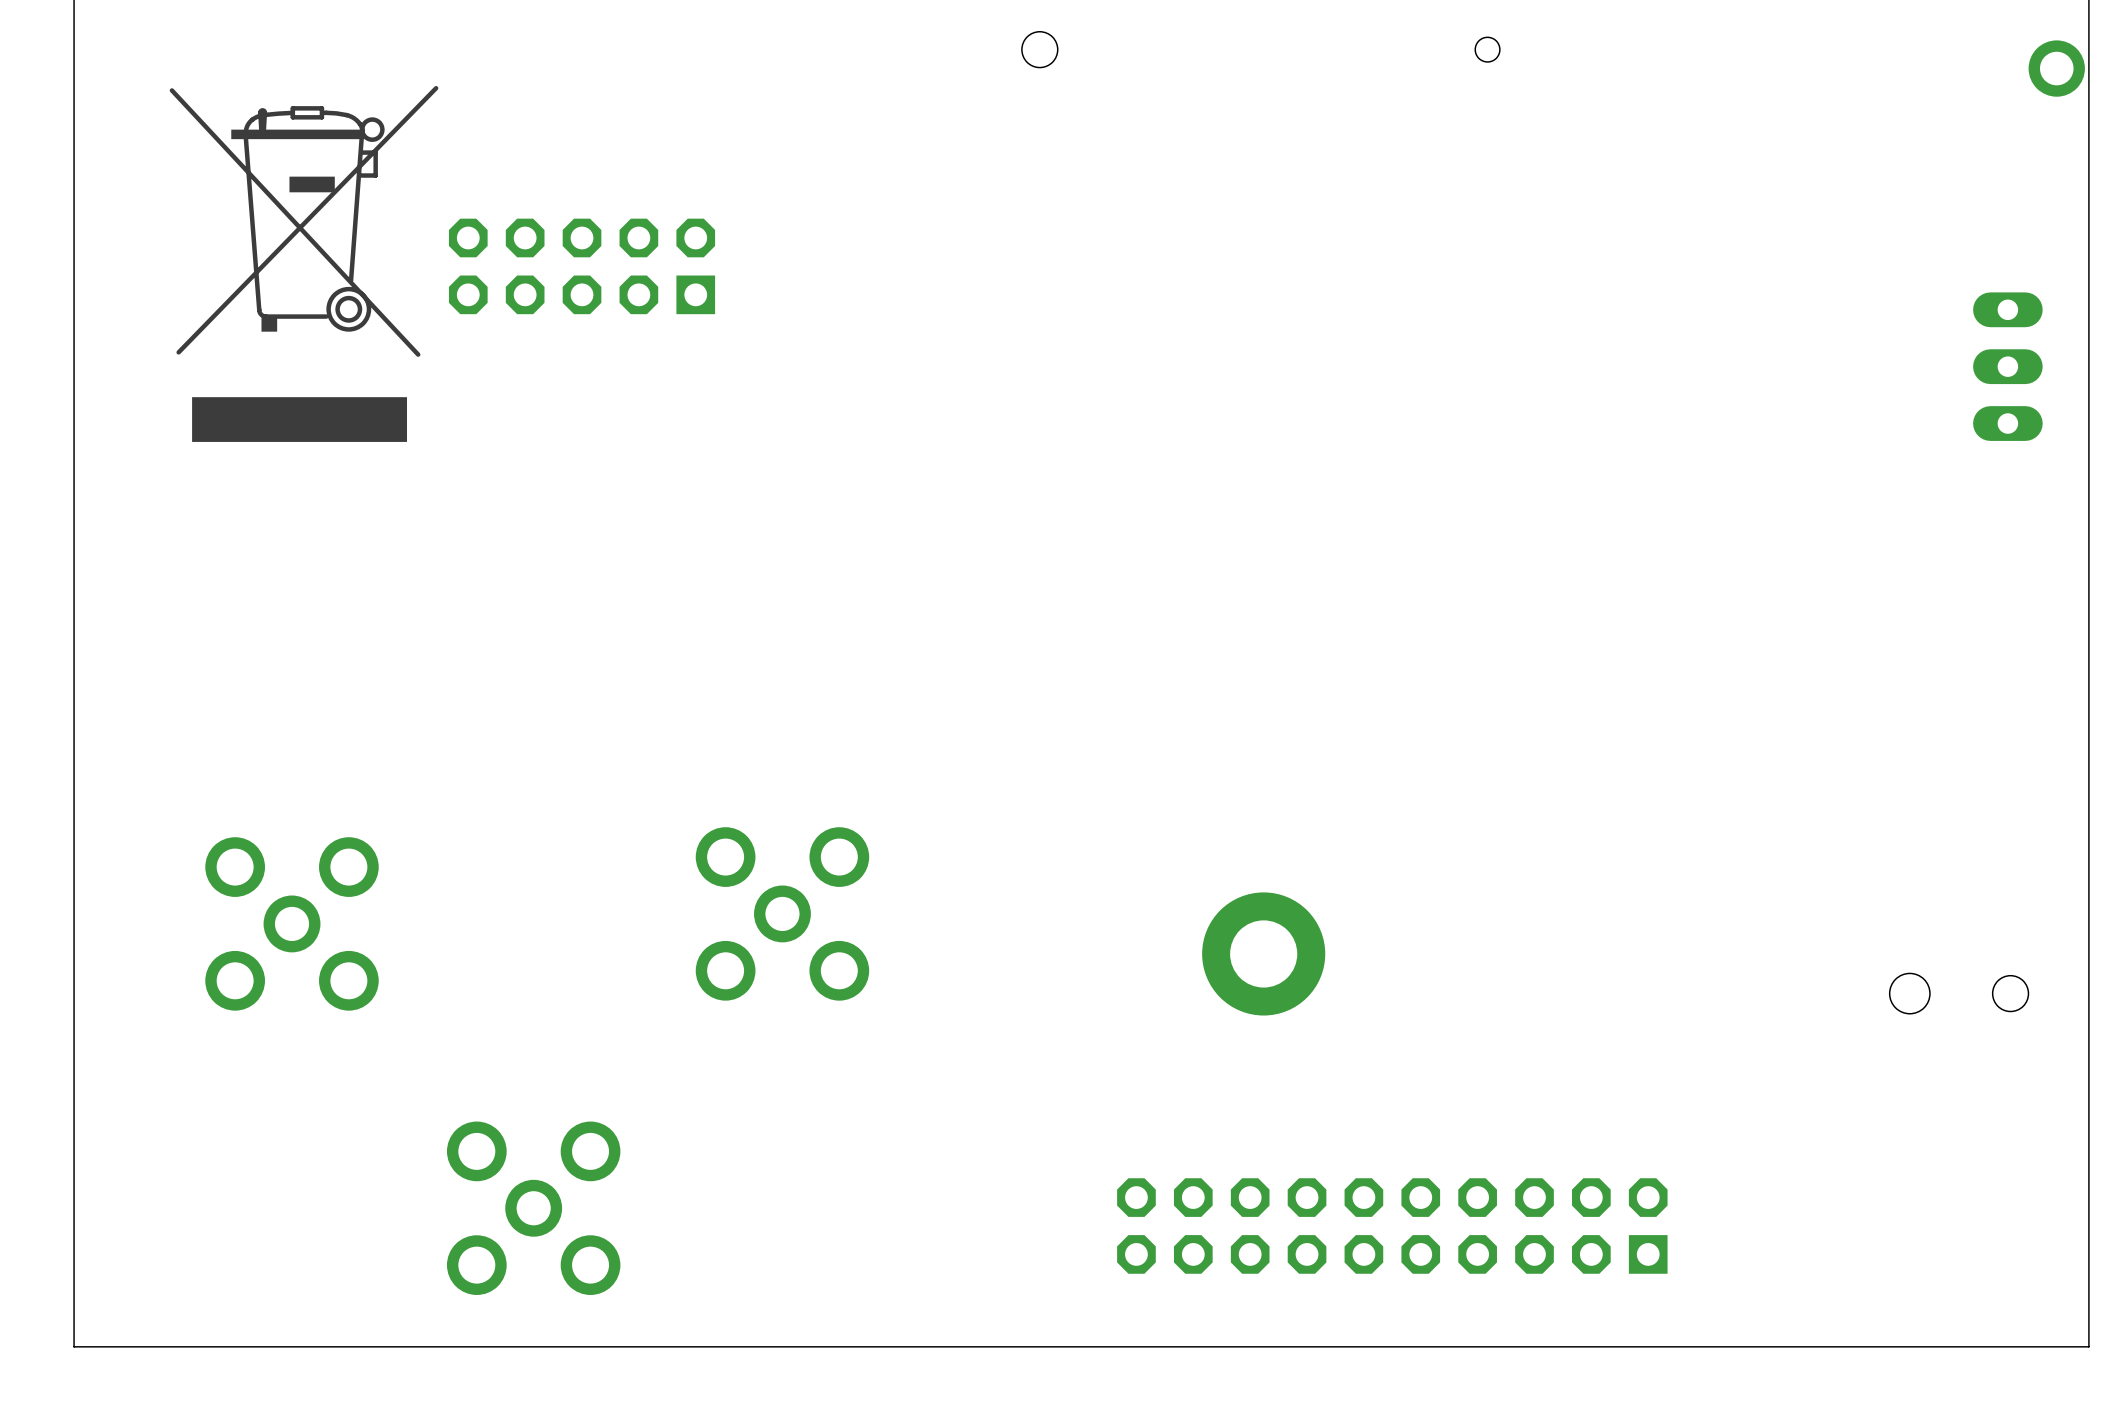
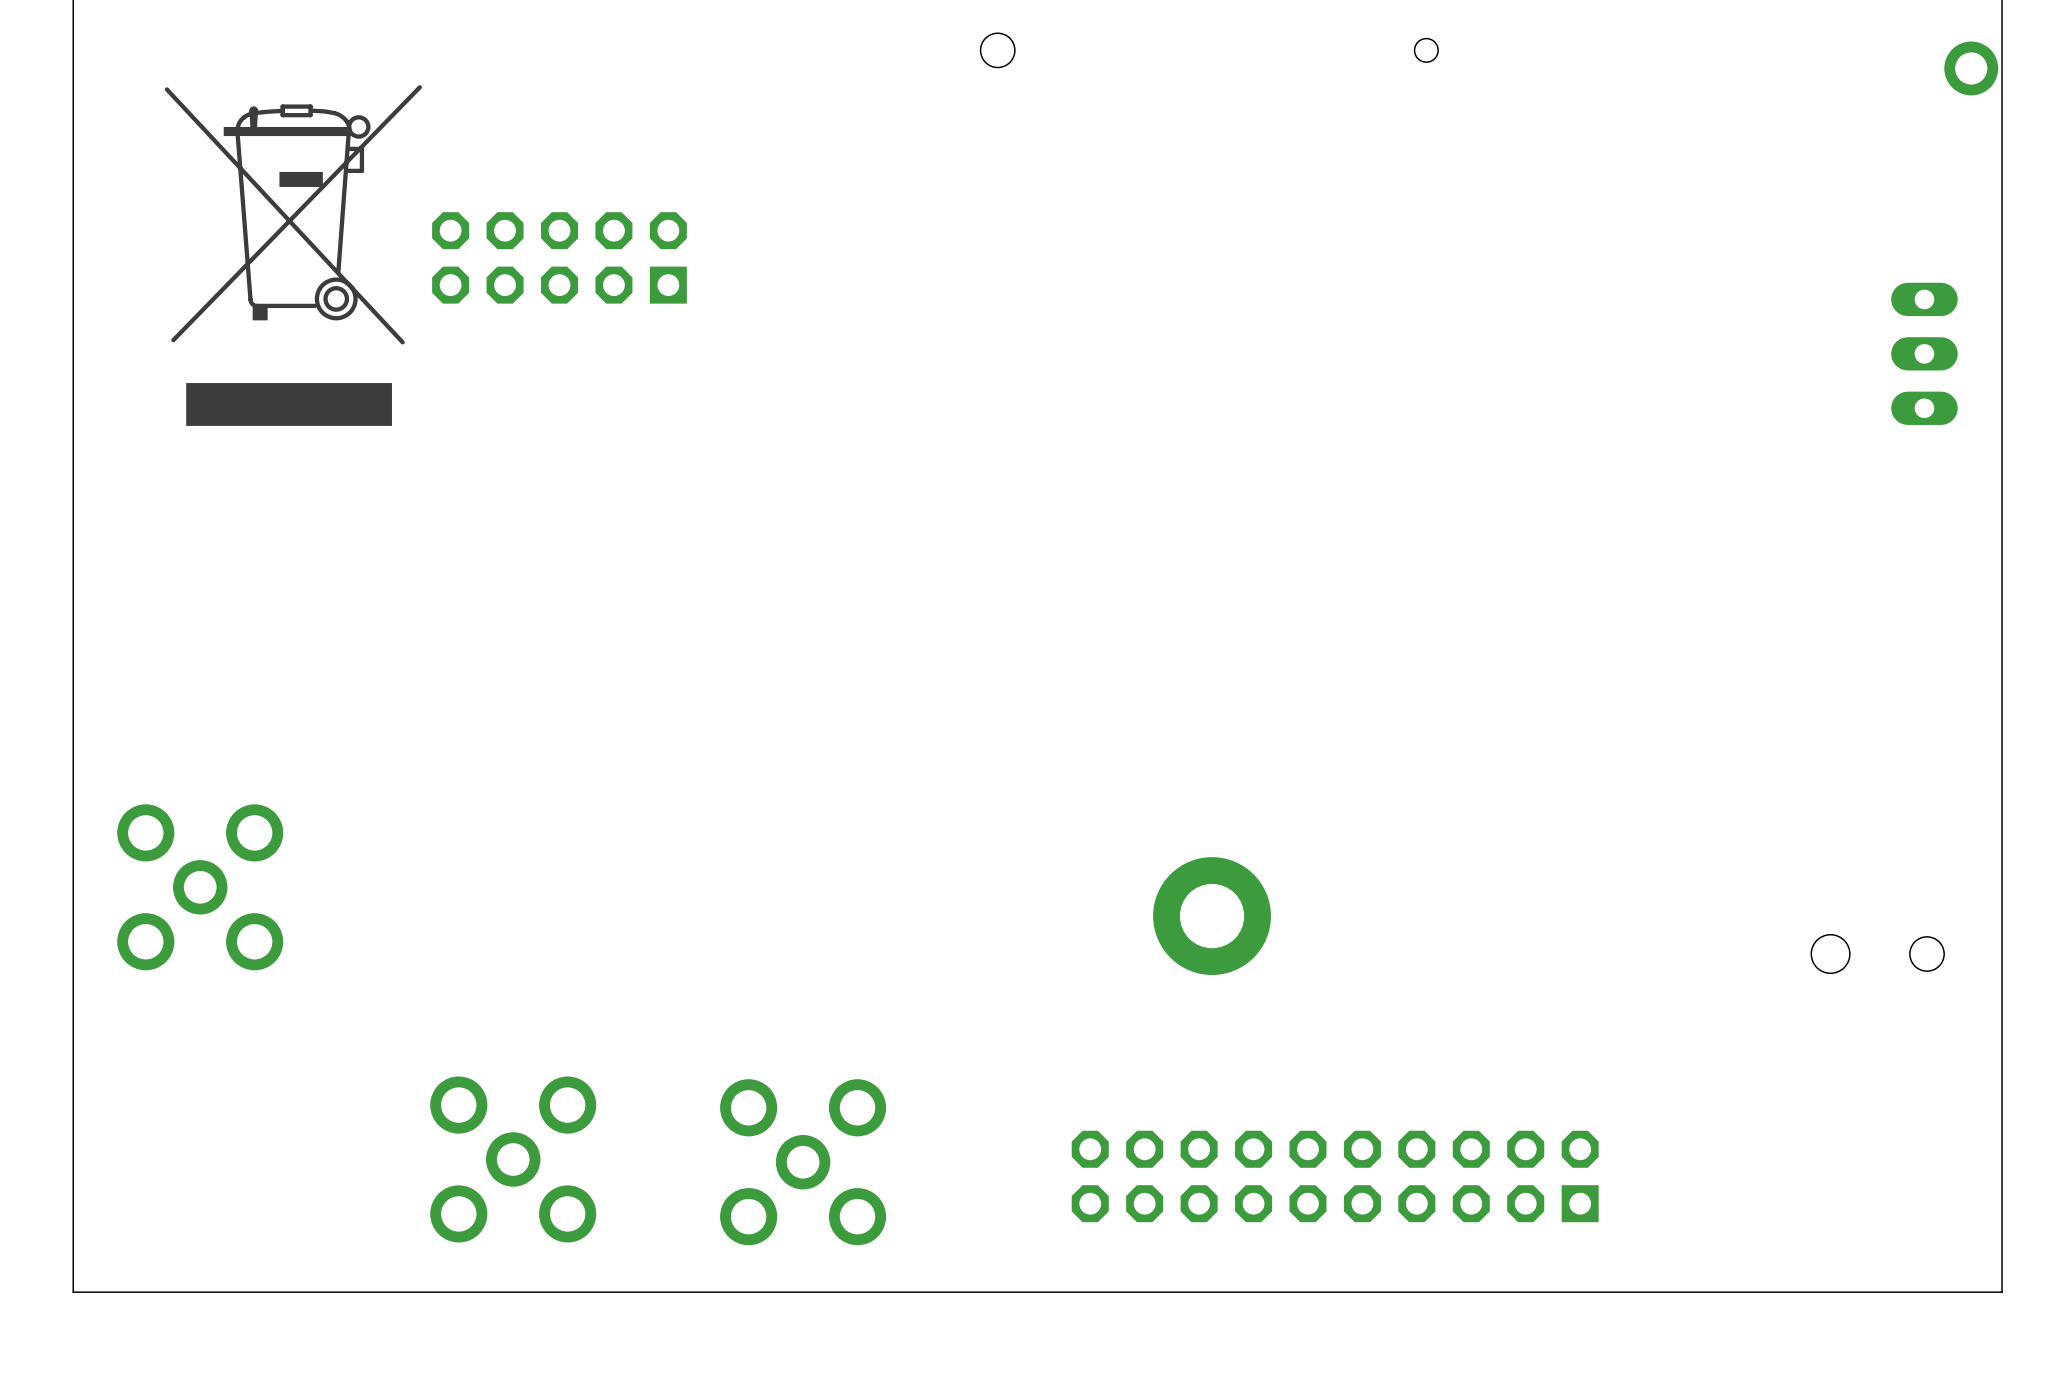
part: (782, 913) -> none
part position: (292, 923) -> (200, 887)
part: none -> (803, 1162)

